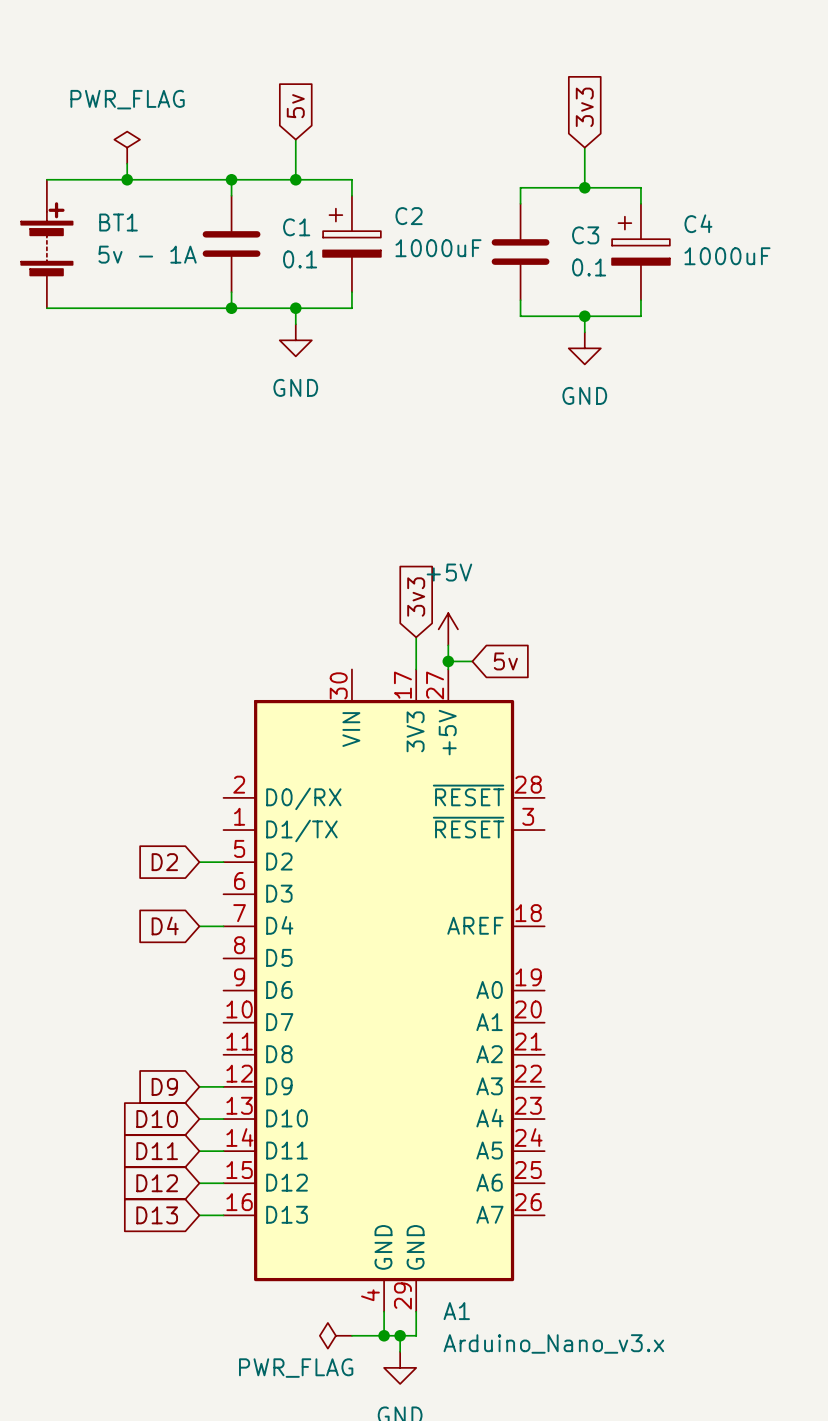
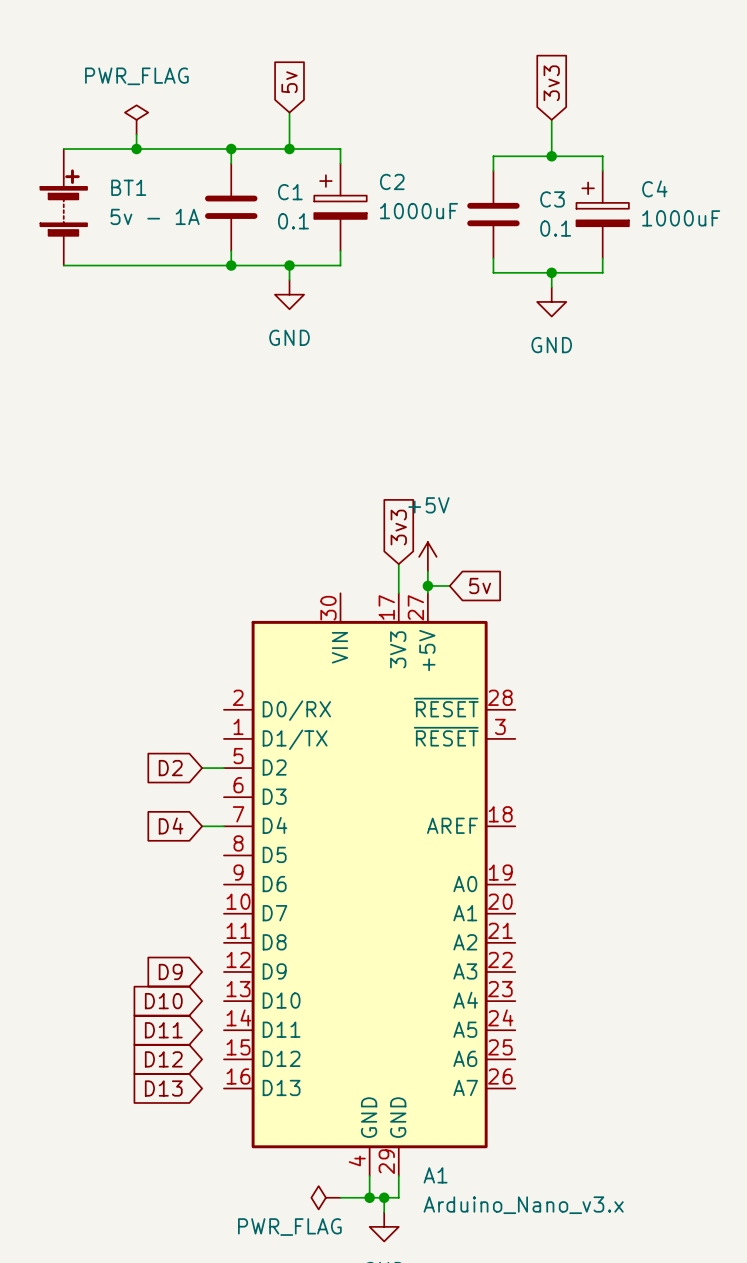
wire: (199, 1086) (223, 1086) -> none
wire: (199, 1119) (223, 1119) -> none
wire: (199, 1151) (223, 1151) -> none
wire: (199, 1183) (223, 1183) -> none
wire: (199, 1215) (223, 1215) -> none

